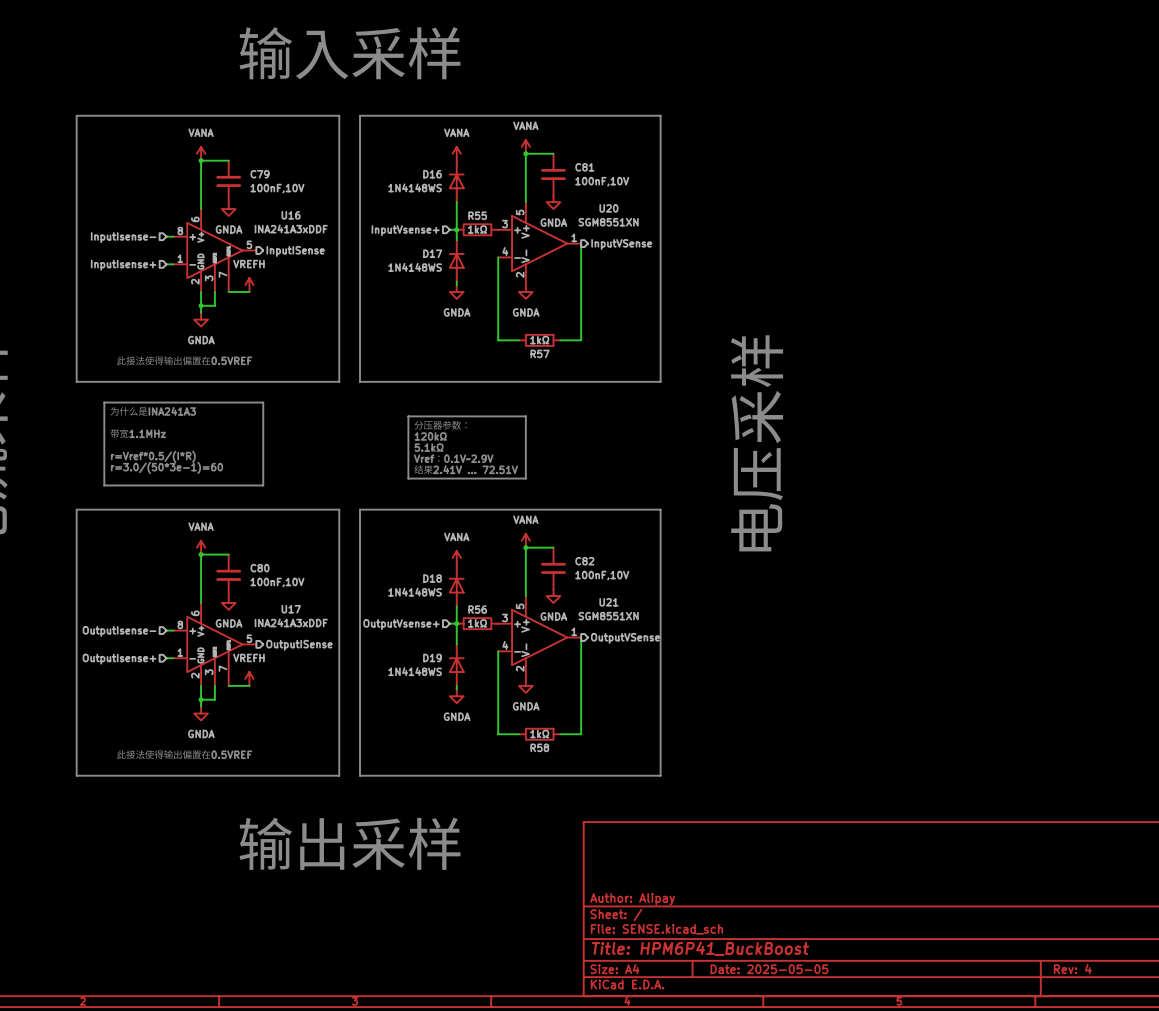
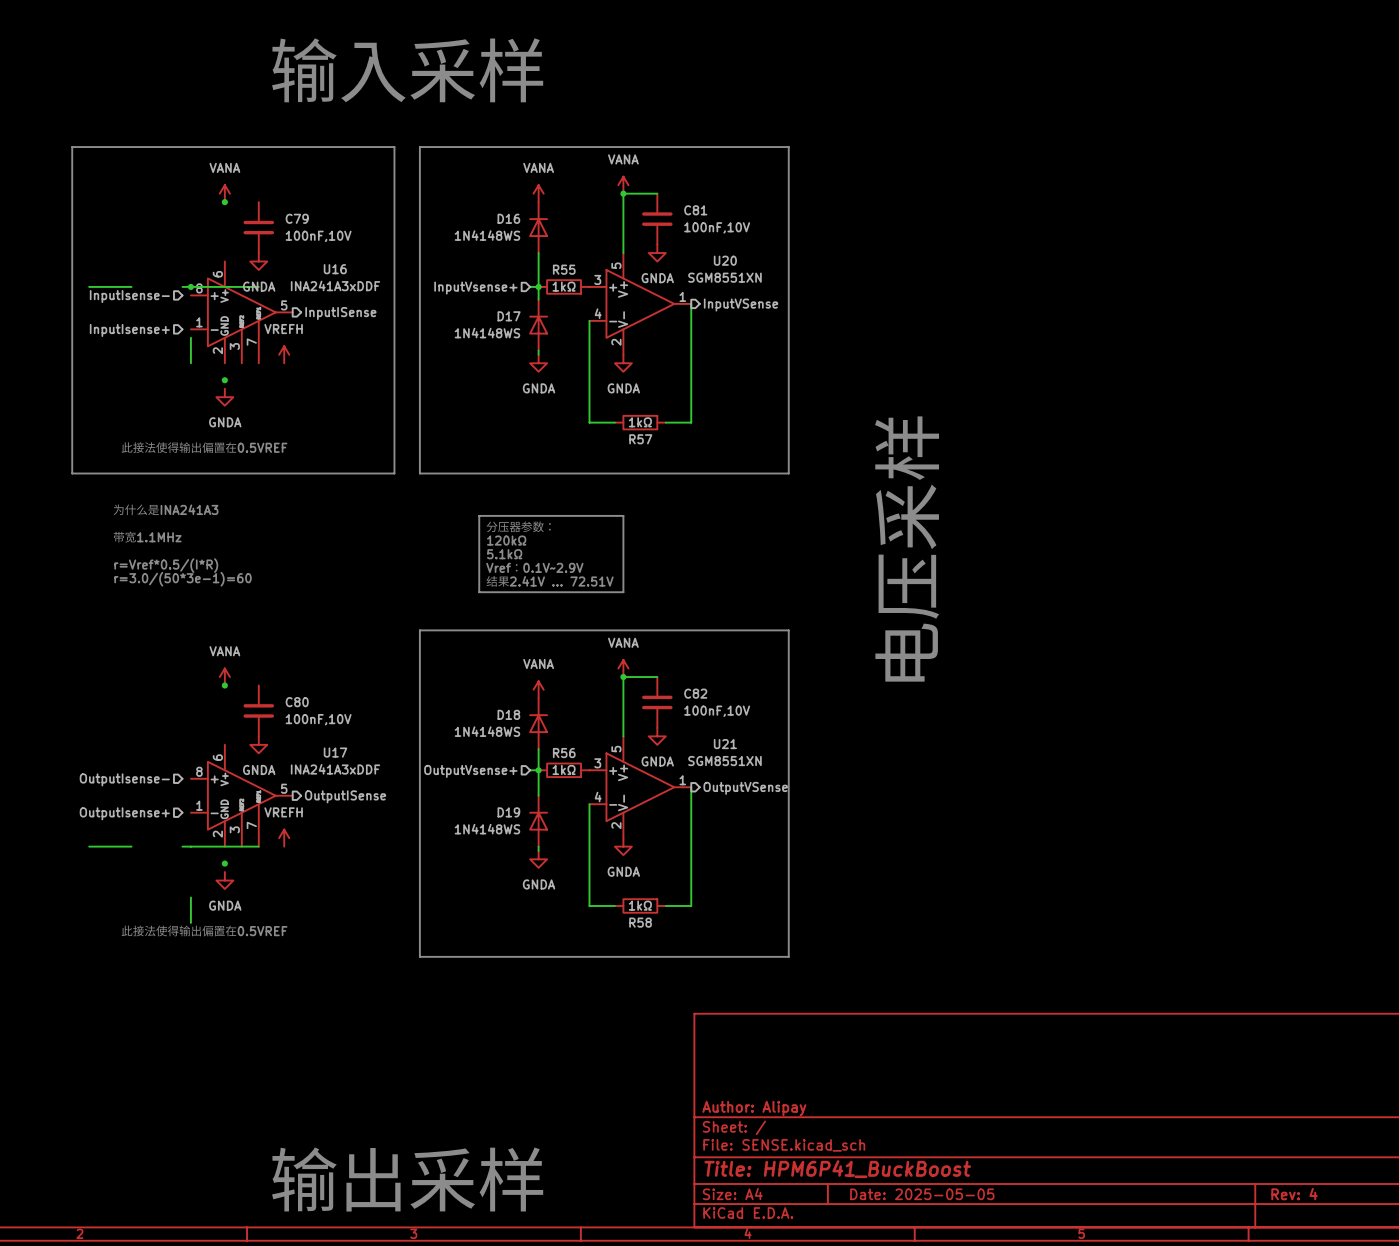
wire: (228, 160) (201, 160) (201, 209) -> none
wire: none -> (89, 286) (131, 286)
wire: none -> (182, 286) (258, 286)
junction: none -> (190, 286)
wire: (166, 236) (173, 236) -> none
wire: (166, 264) (173, 264) -> none
wire: (201, 291) (201, 312) -> (190, 337) (190, 363)
wire: (214, 291) (214, 305) (201, 305) -> none
wire: (228, 291) (249, 291) -> none
line: (104, 402) (263, 402) (263, 485) (104, 485) (104, 402) -> none
line: (76, 509) (76, 775) (339, 775) (339, 509) (76, 509) -> none
wire: (228, 554) (201, 554) (201, 602) -> none
wire: (166, 630) (173, 630) -> none
wire: (166, 658) (173, 658) -> none
wire: none -> (89, 846) (131, 846)
wire: (201, 685) (201, 706) -> (190, 897) (190, 922)
wire: (214, 685) (214, 699) (201, 699) -> none
wire: (228, 685) (249, 685) -> (258, 846) (182, 846)
text position: 输出采样 (350, 843) -> 输出采样 (407, 1179)

